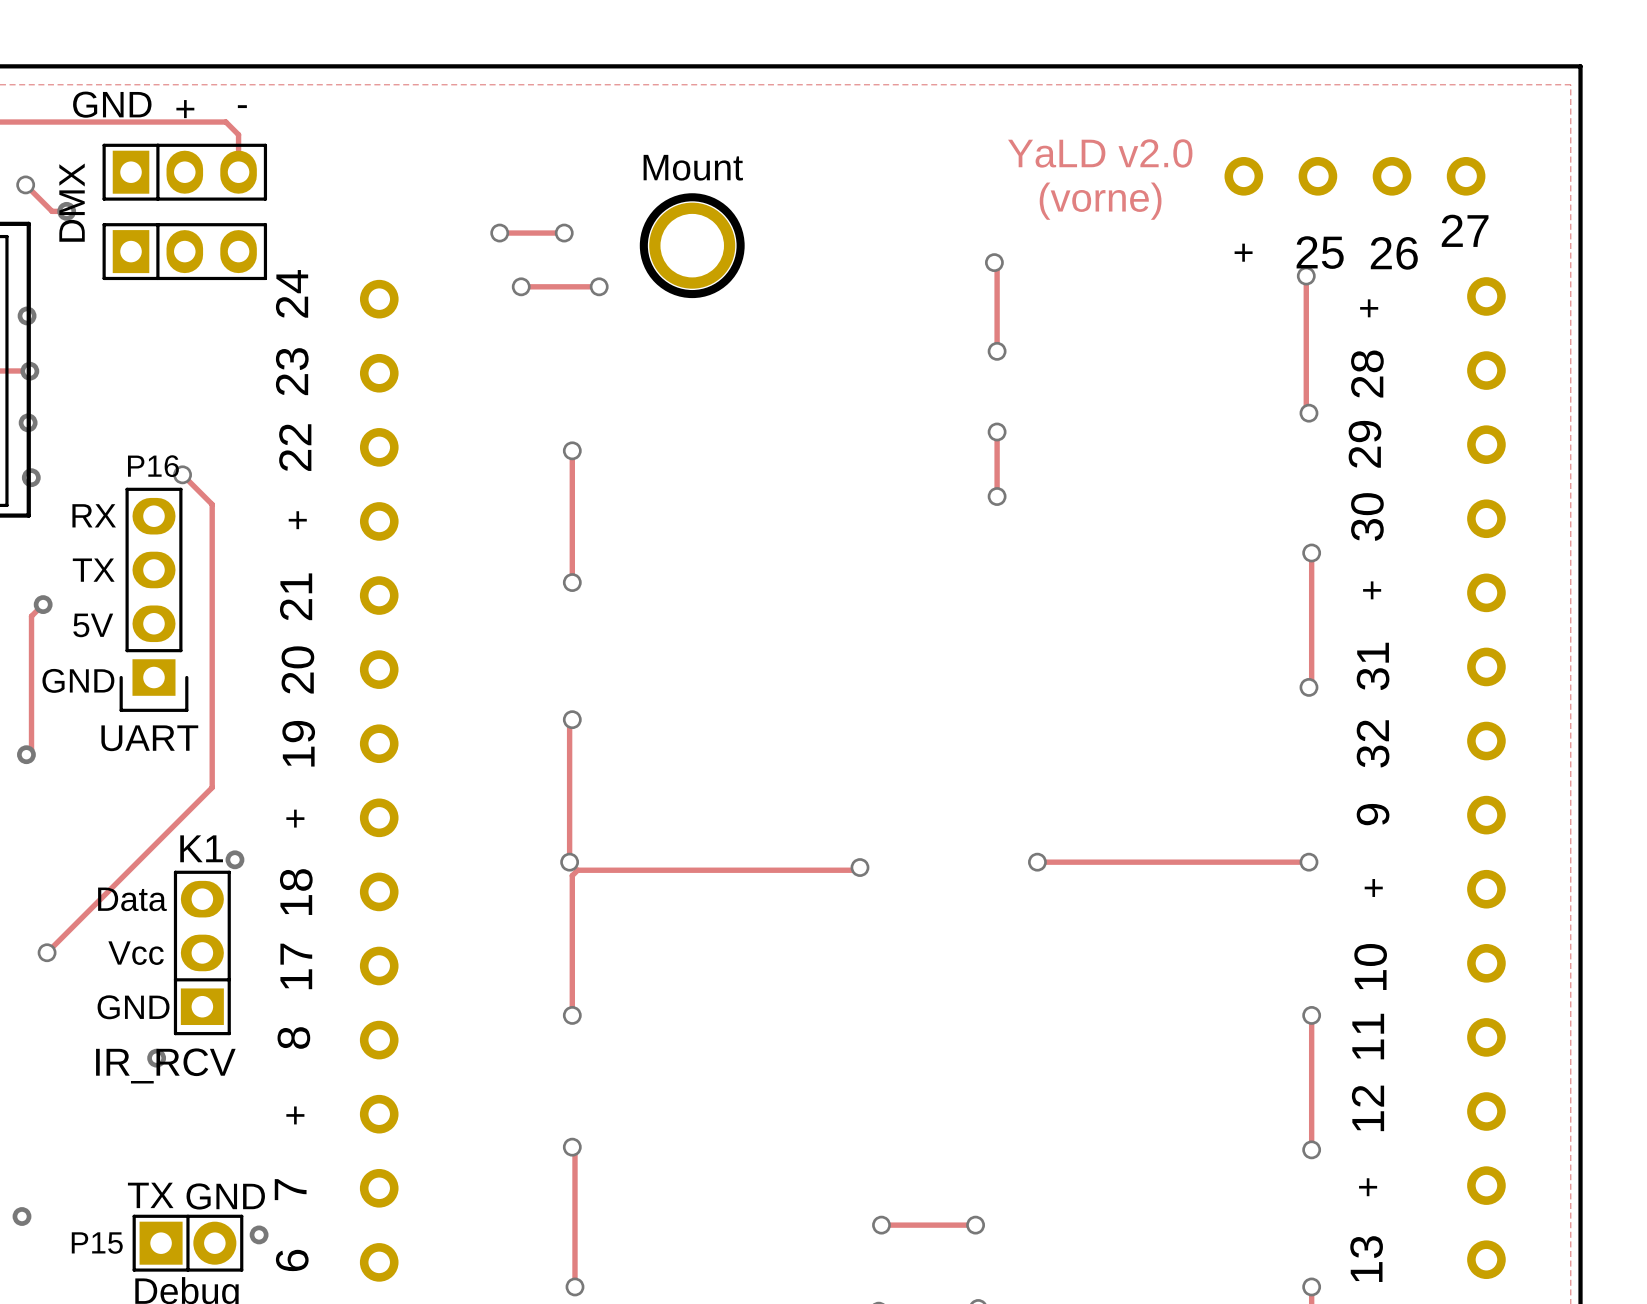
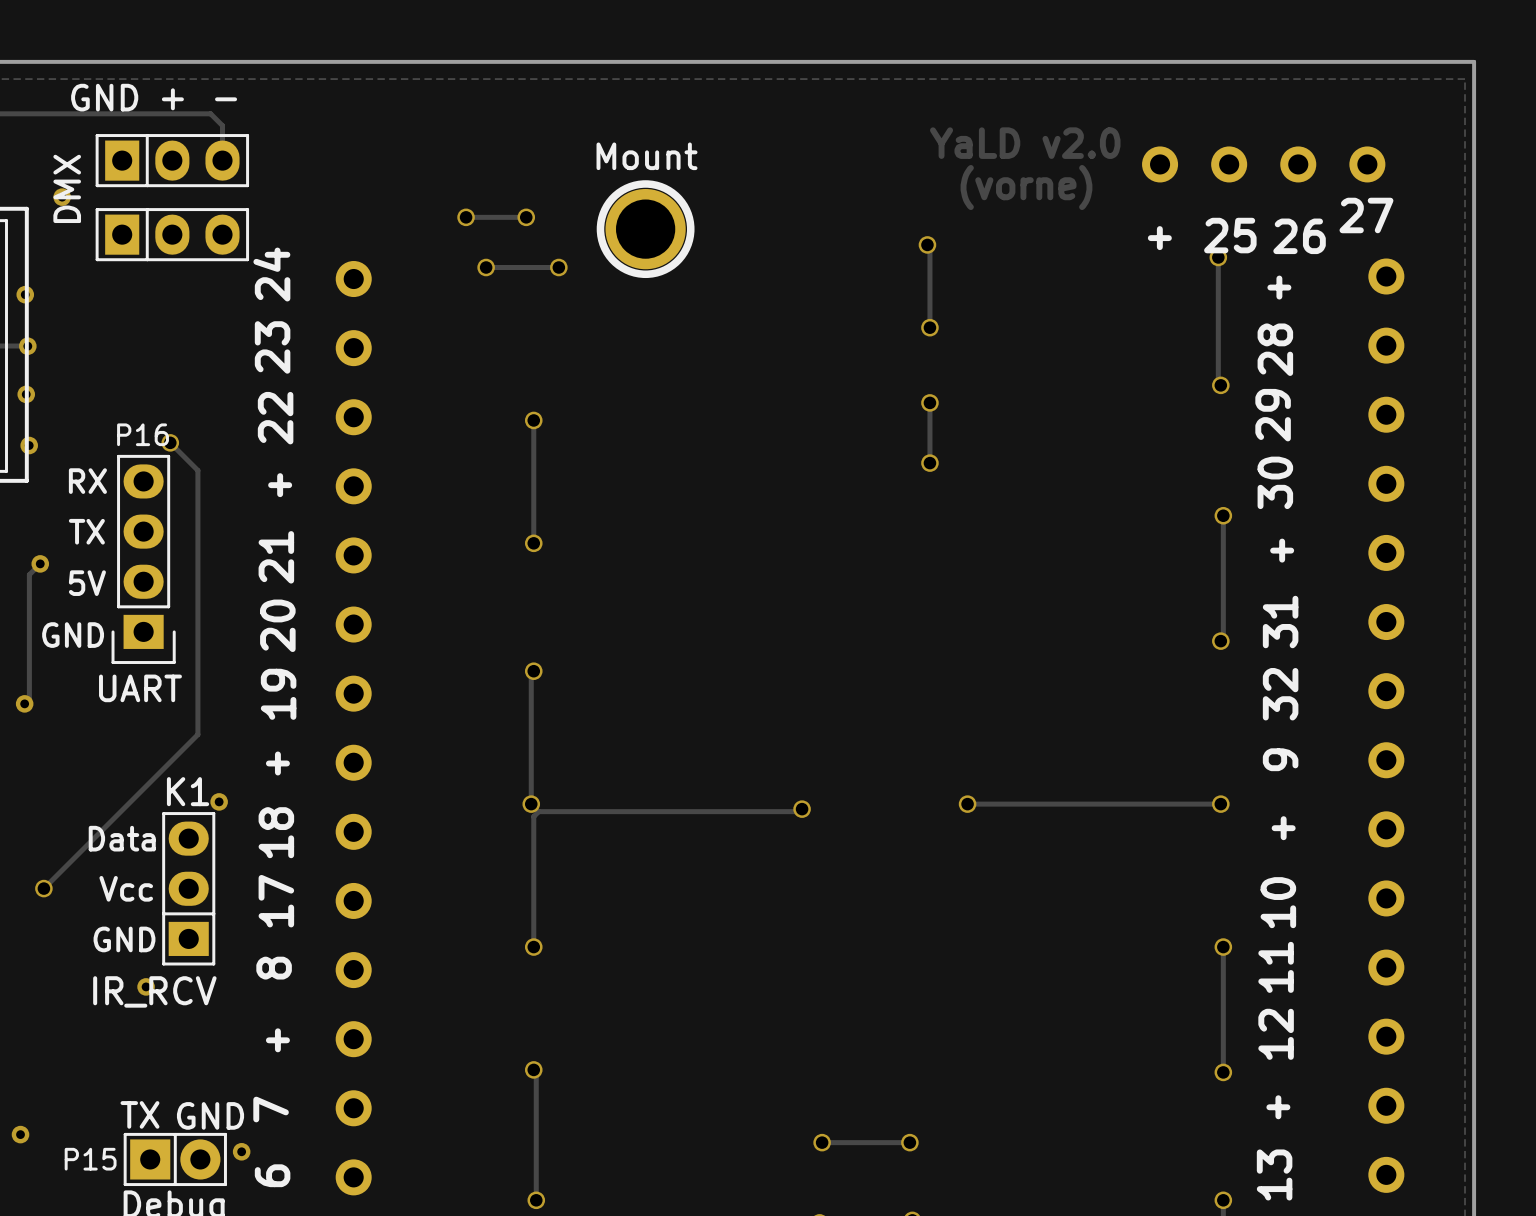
track: (25, 184) (52, 211) (66, 211) -> none
via: (25, 184) -> none

